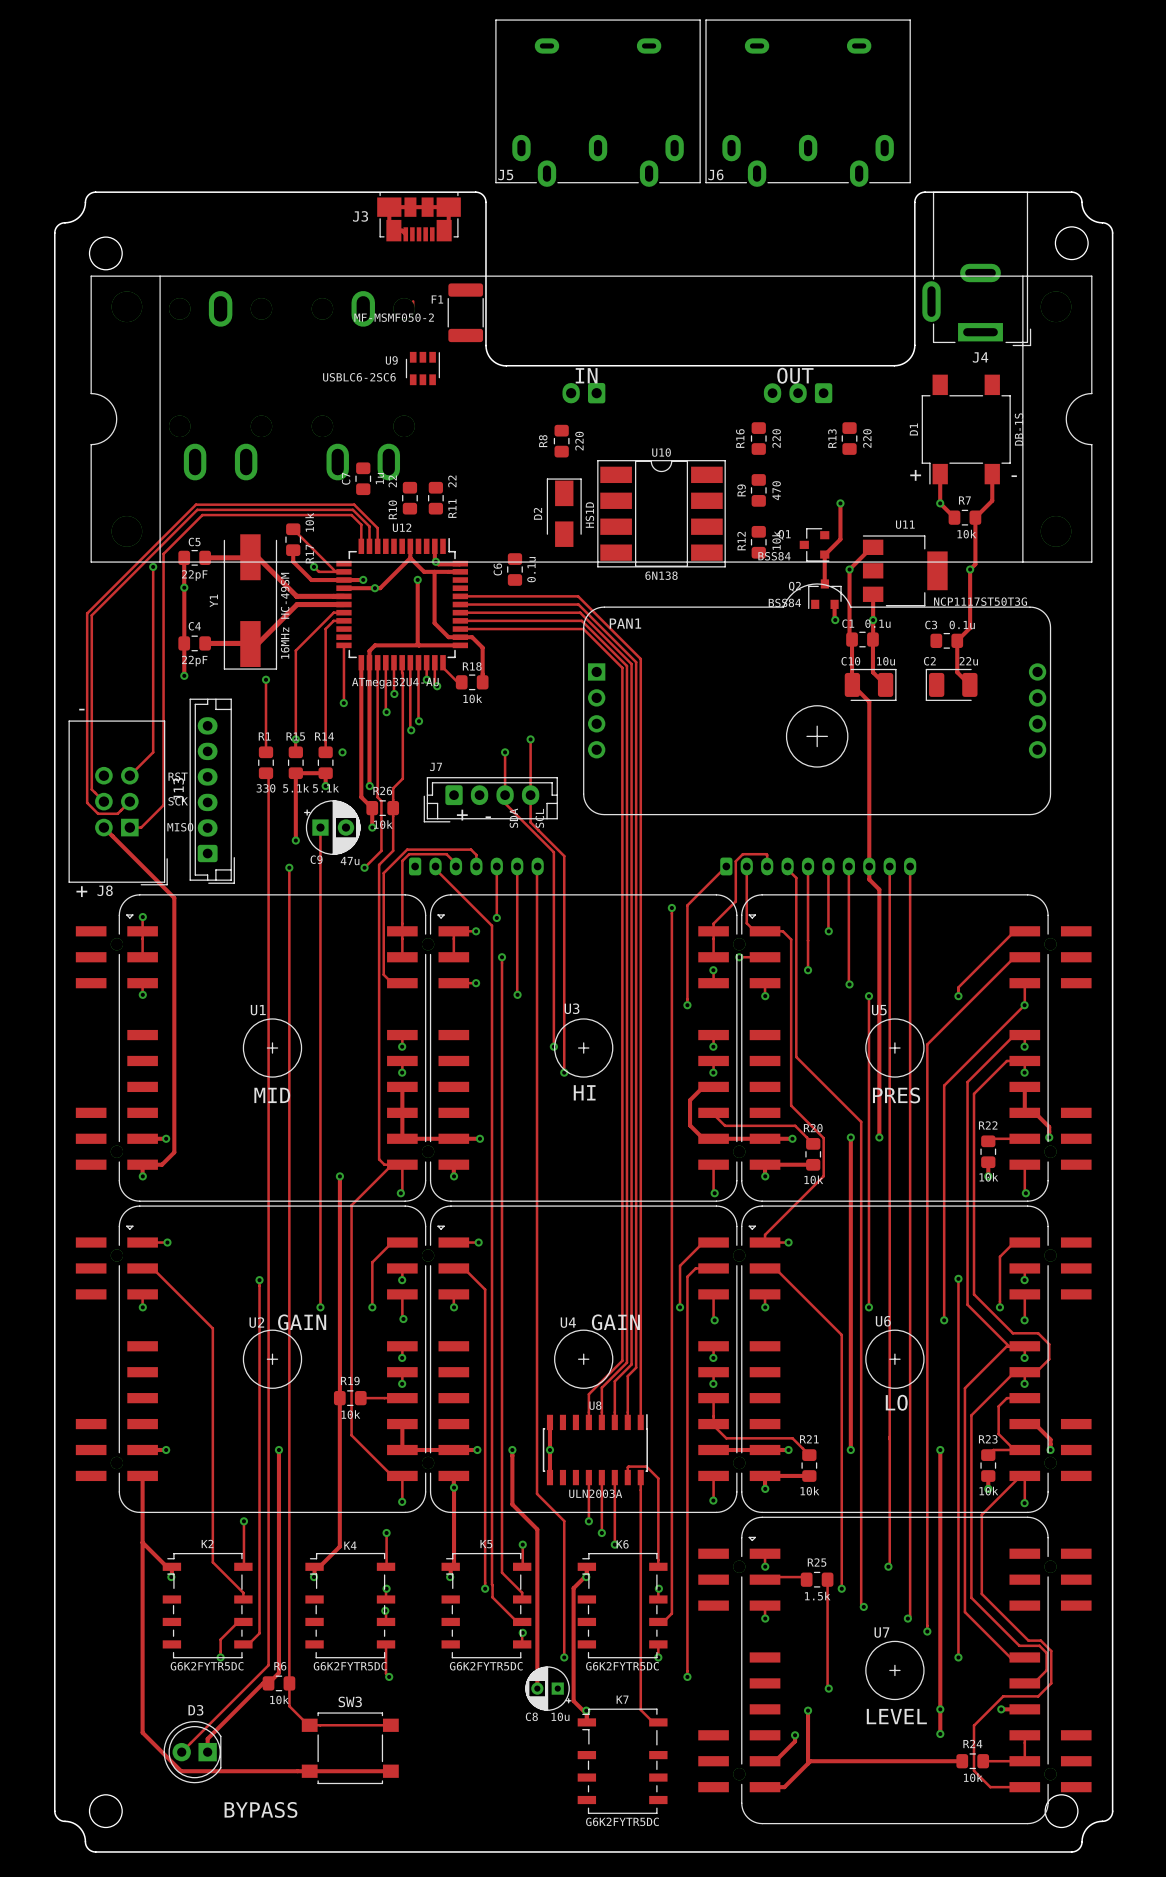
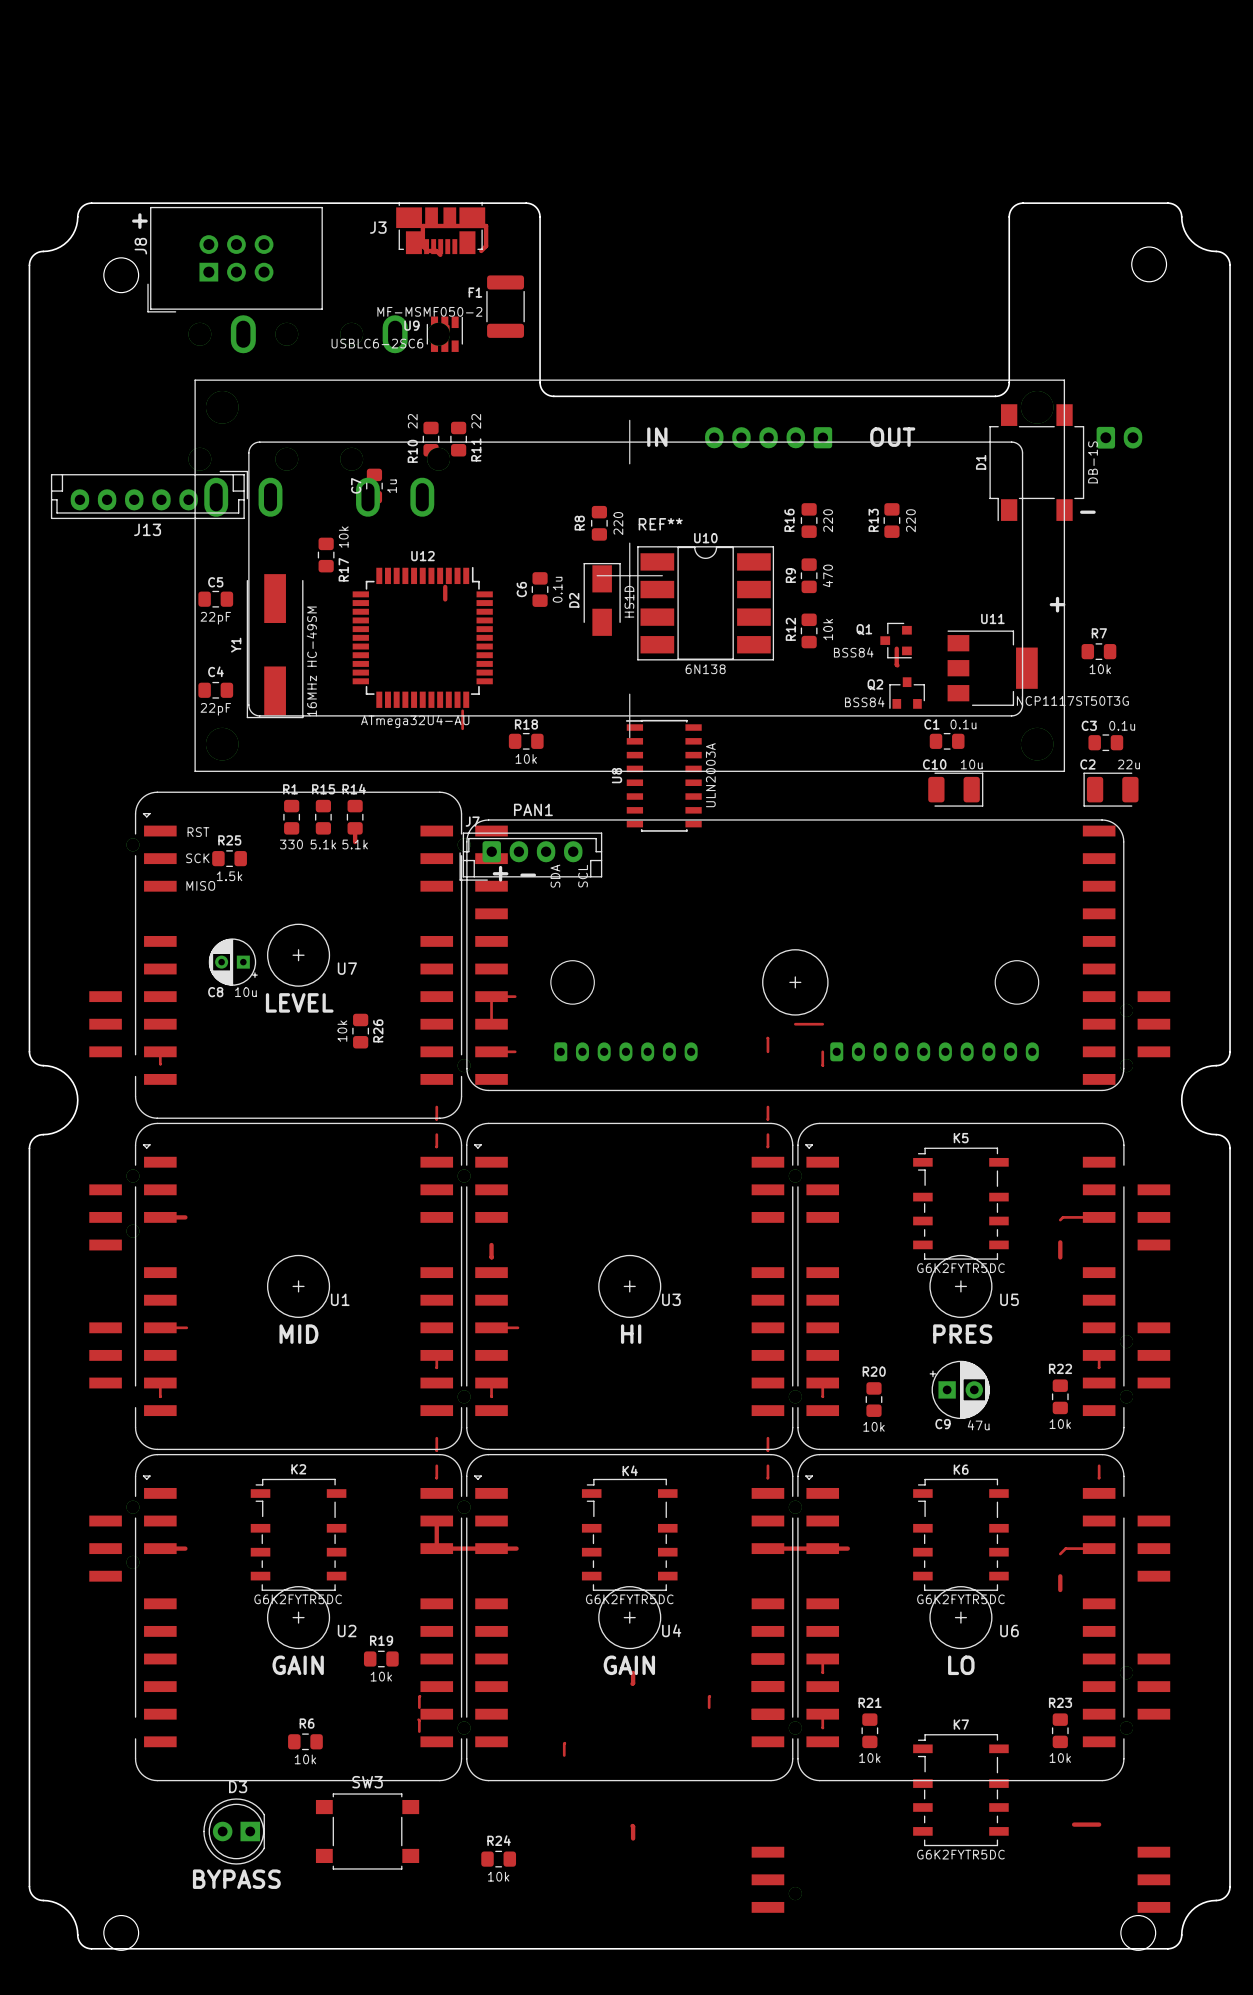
J5: (598, 103) -> none
J6: (808, 103) -> none
board edge: none -> (1023, 203) (1171, 203) (1179, 210) (1184, 230) (1191, 241) (1203, 248) (1223, 253) (1229, 263) (1230, 1051) (1228, 1058) (1223, 1063) (1203, 1068) (1191, 1075) (1184, 1086) (1181, 1100) (1184, 1113) (1191, 1124) (1203, 1131) (1223, 1136) (1228, 1141) (1230, 1148) (1230, 1886) (1225, 1896) (1216, 1900)
board edge: none -> (1023, 203) (1014, 205) (1009, 215) (1009, 384) (1003, 393) (995, 396)
text: none -> + (139, 221)
J3 position: (419, 216) -> (440, 227)
J4: (976, 268) -> none
F1 position: (465, 312) -> (505, 306)
board edge: (506, 365) (899, 365) (908, 359) (914, 347) (914, 202) (919, 193) (1073, 192) (1080, 197) (1083, 210) (1087, 216) (1094, 221) (1107, 224) (1111, 229) (1112, 1811) -> none
board edge: (506, 365) (493, 361) (488, 355) (486, 348) (485, 202) (483, 196) (478, 192) (94, 192) (86, 197) (83, 210) (79, 216) (72, 221) (59, 224) (55, 230) (55, 1815) (59, 1819) (72, 1822) (79, 1827) (83, 1833) (86, 1846) (95, 1851) (1071, 1851) -> none
board edge: none -> (995, 396) (548, 395) (541, 389) (540, 382) (539, 215) (536, 207) (528, 203) (89, 203) (79, 210) (75, 230) (67, 241) (56, 248) (37, 252) (31, 258) (29, 265) (29, 1051) (31, 1058) (36, 1063) (56, 1068) (67, 1075) (75, 1086) (77, 1100) (75, 1113) (67, 1124) (56, 1131) (36, 1136) (31, 1141) (29, 1148) (29, 1886)
U9 position: (422, 368) -> (444, 334)
text position: IN (586, 375) -> IN (657, 437)
text position: OUT (795, 375) -> OUT (892, 437)
part: (583, 393) -> none
part: (798, 393) -> none
part: none -> (768, 437)
part: none -> (1119, 437)
part: (591, 419) -> none
R16 position: (758, 438) -> (809, 520)
R13 position: (849, 438) -> (891, 520)
R8 position: (561, 441) -> (599, 523)
track: (940, 474) (940, 503) (954, 517) -> none
track: (992, 474) (992, 500) (975, 517) (975, 564) (970, 569) (970, 627) (957, 640) (957, 672) (969, 684) -> none
text position: + (915, 475) -> + (1057, 604)
C7 position: (363, 478) -> (374, 486)
R9 position: (758, 490) -> (809, 575)
R10 position: (409, 498) -> (431, 439)
R11 position: (435, 498) -> (458, 439)
track: (840, 503) (840, 539) (824, 554) (824, 583) -> none
via: (840, 503) -> none
via: (940, 503) -> none
D2 position: (564, 512) -> (602, 599)
U10 position: (661, 513) -> (705, 603)
R7 position: (964, 517) -> (1098, 651)
track: (293, 529) (335, 571) -> none
REF**: none -> (629, 575)
R17 position: (293, 539) -> (326, 555)
R12 position: (758, 542) -> (809, 630)
Q1 position: (814, 544) -> (896, 640)
track: (361, 546) (361, 524) (351, 515) (202, 515) (163, 553) (163, 805) (141, 827) (129, 827) -> none
track: (369, 546) (369, 526) (352, 509) (197, 509) (91, 615) (91, 789) (103, 801) -> none
track: (377, 546) (377, 528) (354, 504) (195, 504) (87, 613) (87, 802) (98, 813) (117, 813) (129, 801) -> none
track: (434, 546) (434, 560) (438, 564) (460, 563) -> none
track: (873, 547) (849, 569) (849, 637) (852, 639) (852, 684) (869, 701) (869, 879) (879, 889) (879, 1137) -> none
track: (293, 550) (293, 561) (311, 580) (363, 580) -> none
track: (184, 557) (184, 587) -> none
track: (205, 557) (257, 557) (296, 596) (343, 596) -> none
via: (435, 561) -> none
track: (153, 566) (153, 752) (129, 775) -> none
via: (153, 566) -> none
track: (313, 566) (318, 571) (343, 571) -> none
via: (313, 566) -> none
C6 position: (514, 569) -> (540, 589)
via: (849, 569) -> none
via: (970, 569) -> none
U11 position: (905, 570) -> (992, 668)
track: (434, 571) (434, 623) (448, 637) (472, 637) (482, 647) (482, 682) -> none
track: (460, 571) (424, 571) (410, 558) (380, 588) (343, 588) -> none
via: (363, 579) -> none
track: (417, 579) (419, 645) -> none
via: (417, 579) -> none
PAN1 footprint: [583, 583, 1052, 816] -> [457, 819, 1134, 1092]
track: (184, 587) (184, 643) -> none
via: (184, 587) -> none
via: (374, 588) -> none
Q2 position: (824, 594) -> (907, 693)
track: (873, 594) (872, 672) (885, 684) -> none
track: (460, 596) (578, 596) (640, 658) (640, 1422) -> none
track: (343, 604) (297, 604) (257, 644) (205, 643) -> none
U12 position: (402, 604) -> (422, 637)
track: (460, 604) (578, 604) (636, 662) (636, 1367) (627, 1376) (627, 1422) -> none
track: (343, 612) (333, 612) (295, 650) (295, 752) -> none
track: (460, 612) (580, 612) (631, 664) (631, 1364) (614, 1381) (614, 1422) -> none
track: (343, 620) (333, 620) (325, 628) (325, 752) -> none
track: (460, 620) (581, 620) (626, 665) (626, 1362) (601, 1387) (601, 1422) -> none
via: (835, 620) -> none
via: (873, 620) -> none
PAN1 name position: PAN1 (625, 623) -> PAN1 (533, 809)
track: (460, 629) (583, 629) (622, 667) (622, 1360) (588, 1394) (588, 1422) -> none
C1 position: (862, 639) -> (947, 741)
C3 position: (946, 640) -> (1105, 742)
track: (184, 643) (184, 675) -> none
track: (343, 645) (343, 703) -> none
track: (460, 645) (375, 645) (369, 650) (369, 786) -> none
track: (361, 662) (361, 797) (372, 808) (372, 827) -> none
track: (377, 662) (377, 797) (381, 801) (381, 850) (364, 867) -> none
track: (385, 662) (386, 712) -> none
track: (393, 662) (394, 694) -> none
track: (402, 662) (402, 778) (393, 788) (393, 850) (379, 864) (379, 1159) (384, 1164) (402, 1164) (400, 1193) -> none
track: (410, 662) (411, 730) -> none
track: (418, 662) (419, 721) -> none
track: (434, 662) (434, 683) (437, 686) -> none
track: (443, 662) (443, 667) (457, 682) (461, 682) -> none
via: (184, 675) -> none
track: (266, 679) (266, 752) -> none
via: (266, 679) -> none
via: (426, 679) -> none
R18 position: (472, 682) -> (526, 741)
C10 position: (870, 684) -> (955, 789)
C2 position: (951, 684) -> (1110, 789)
via: (437, 686) -> none
via: (394, 694) -> none
via: (343, 703) -> none
text: - (81, 709) -> none
via: (386, 712) -> none
via: (419, 721) -> none
via: (411, 730) -> none
via: (295, 739) -> none
track: (530, 739) (530, 822) (564, 856) (564, 1072) -> none
via: (530, 739) -> none
via: (342, 752) -> none
track: (505, 752) (505, 803) (553, 852) (553, 1046) -> none
via: (505, 752) -> none
track: (266, 773) (268, 775) (268, 1665) (181, 1752) -> none
track: (325, 773) (295, 773) (295, 840) -> none
via: (325, 786) -> none
via: (369, 786) -> none
J13 rotation: 0° (212, 791) -> 90° counterclockwise (149, 494)
J13 position: (212, 791) -> (149, 494)
J8 rotation: 0° (118, 802) -> 90° clockwise (235, 259)
J8 position: (118, 802) -> (235, 259)
R26 rotation: 0° (382, 808) -> 90° clockwise (360, 1031)
R26 position: (382, 808) -> (360, 1031)
track: (103, 827) (174, 897) (174, 1152) (162, 1164) (142, 1164) (142, 1176) -> none
track: (320, 827) (320, 1307) -> none
C9 position: (332, 827) -> (959, 1389)
via: (372, 827) -> none
via: (295, 840) -> none
track: (435, 866) (435, 869) (492, 925) (492, 1597) (517, 1621) (522, 1621) -> none
track: (455, 866) (455, 863) (446, 854) (409, 854) (402, 860) (402, 957) -> none
track: (476, 866) (476, 854) (471, 849) (407, 849) (383, 873) (383, 974) (392, 983) (402, 983) -> none
part position: (476, 866) -> (625, 1051)
track: (496, 866) (496, 917) -> none
track: (517, 866) (517, 994) -> none
track: (537, 866) (537, 1493) (564, 1521) (564, 1657) -> none
track: (726, 866) (687, 905) (687, 1005) -> none
track: (746, 866) (746, 923) (754, 931) (782, 931) (791, 939) (791, 1105) (823, 1138) (823, 1176) (765, 1234) (765, 1242) (788, 1242) -> none
track: (767, 866) (766, 854) (742, 854) (735, 861) (735, 901) (713, 923) (713, 957) -> none
track: (787, 866) (787, 869) (796, 877) (796, 1057) (861, 1121) (861, 1604) (863, 1606) -> none
part position: (818, 866) -> (934, 1051)
track: (828, 866) (828, 931) -> none
track: (848, 866) (849, 984) -> none
track: (889, 866) (888, 1566) -> none
track: (910, 866) (910, 1616) (907, 1618) -> none
track: (289, 867) (289, 1683) -> none
via: (289, 867) -> none
via: (364, 867) -> none
text: + (81, 891) -> none
track: (671, 907) (671, 1613) (663, 1621) (658, 1621) -> none
via: (671, 907) -> none
track: (142, 917) (142, 957) -> none
via: (142, 917) -> none
via: (496, 917) -> none
via: (476, 931) -> none
via: (828, 931) -> none
track: (1024, 931) (1014, 931) (958, 987) (958, 996) -> none
text: none -> LEVEL (299, 1002)
track: (502, 957) (502, 1572) (522, 1592) (522, 1599) -> none
via: (502, 957) -> none
via: (739, 957) -> none
track: (1024, 957) (1014, 957) (927, 1044) (927, 1631) -> none
via: (713, 970) -> none
via: (808, 970) -> none
via: (476, 983) -> none
track: (1024, 983) (1024, 1005) (944, 1085) (944, 1320) -> none
via: (849, 984) -> none
via: (142, 994) -> none
via: (517, 994) -> none
via: (765, 996) -> none
track: (868, 996) (868, 1307) -> none
via: (868, 996) -> none
via: (958, 996) -> none
via: (687, 1005) -> none
via: (1024, 1005) -> none
U3 name position: U3 (572, 1008) -> U3 (671, 1299)
U1 name position: U1 (258, 1010) -> U1 (340, 1299)
U5 name position: U5 (879, 1010) -> U5 (1009, 1299)
via: (402, 1046) -> none
via: (553, 1046) -> none
via: (713, 1046) -> none
track: (1024, 1046) (1024, 1035) (1014, 1035) (967, 1082) (967, 1304) (1009, 1346) -> none
via: (1024, 1046) -> none
U1 position: (272, 1048) -> (298, 1286)
U3 position: (583, 1048) -> (629, 1286)
U5 position: (894, 1048) -> (960, 1286)
via: (402, 1072) -> none
via: (564, 1072) -> none
via: (713, 1072) -> none
track: (1024, 1072) (1024, 1060) (1006, 1060) (974, 1093) (974, 1294) (1012, 1333) (1038, 1333) (1049, 1344) (1049, 1359) (1036, 1372) (1014, 1372) (971, 1415) (971, 1597) (1019, 1645) (1039, 1645) (1046, 1652) (1046, 1670) (1033, 1683) (1024, 1683) -> none
via: (1024, 1072) -> none
track: (402, 1086) (402, 1138) (479, 1138) -> none
track: (713, 1086) (703, 1086) (690, 1100) (690, 1125) (703, 1138) (792, 1138) -> none
track: (1024, 1086) (1024, 1112) (1035, 1112) (1049, 1127) (1049, 1137) -> none
text position: HI (584, 1092) -> HI (631, 1334)
text position: MID (272, 1095) -> MID (298, 1334)
text position: PRES (896, 1095) -> PRES (962, 1334)
track: (713, 1112) (725, 1125) (795, 1125) (813, 1143) -> none
track: (850, 1137) (850, 1450) -> none
via: (850, 1137) -> none
via: (879, 1137) -> none
via: (1049, 1137) -> none
via: (166, 1138) -> none
via: (479, 1138) -> none
via: (792, 1138) -> none
R22 position: (988, 1151) -> (1060, 1396)
R20 position: (813, 1154) -> (873, 1399)
track: (392, 1164) (351, 1205) (351, 1435) (392, 1475) (402, 1475) (402, 1501) -> none
track: (713, 1164) (714, 1193) -> none
track: (813, 1164) (765, 1164) (765, 1176) -> none
track: (1024, 1164) (1025, 1193) -> none
via: (142, 1176) -> none
track: (339, 1176) (339, 1398) -> none
via: (339, 1176) -> none
via: (454, 1176) -> none
via: (765, 1176) -> none
via: (988, 1176) -> none
via: (400, 1193) -> none
via: (714, 1193) -> none
via: (1025, 1193) -> none
via: (167, 1242) -> none
track: (402, 1242) (392, 1242) (372, 1262) (372, 1307) -> none
via: (478, 1242) -> none
track: (713, 1242) (703, 1242) (680, 1265) (680, 1307) -> none
via: (788, 1242) -> none
track: (1035, 1242) (1014, 1242) (999, 1256) (999, 1307) -> none
track: (142, 1268) (152, 1268) (212, 1328) (212, 1562) (243, 1592) (243, 1599) -> none
track: (453, 1268) (464, 1268) (485, 1289) (485, 1588) -> none
track: (713, 1268) (695, 1268) (687, 1276) (687, 1676) -> none
track: (765, 1268) (775, 1268) (841, 1334) (841, 1588) -> none
track: (958, 1278) (958, 1657) -> none
via: (958, 1278) -> none
track: (259, 1280) (259, 1633) (248, 1644) (243, 1644) -> none
via: (259, 1280) -> none
via: (402, 1280) -> none
via: (1024, 1280) -> none
track: (402, 1294) (403, 1319) -> none
track: (713, 1294) (714, 1320) -> none
track: (1024, 1294) (1024, 1320) -> none
via: (142, 1307) -> none
via: (320, 1307) -> none
via: (372, 1307) -> none
via: (454, 1307) -> none
via: (680, 1307) -> none
via: (765, 1307) -> none
via: (868, 1307) -> none
via: (999, 1307) -> none
via: (403, 1319) -> none
via: (714, 1320) -> none
via: (944, 1320) -> none
via: (1024, 1320) -> none
U6 name position: U6 (883, 1321) -> U6 (1009, 1631)
U2 name position: U2 (256, 1322) -> U2 (347, 1631)
text: GAIN (302, 1322) -> none
U4 name position: U4 (568, 1322) -> U4 (671, 1630)
text: GAIN (615, 1322) -> none
via: (402, 1357) -> none
via: (713, 1357) -> none
track: (1024, 1357) (1024, 1346) (1006, 1346) (964, 1388) (964, 1612) (1010, 1657) (1024, 1657) -> none
via: (1024, 1357) -> none
U2 position: (272, 1359) -> (298, 1617)
U4 position: (583, 1359) -> (629, 1617)
U6 position: (894, 1359) -> (960, 1617)
via: (402, 1383) -> none
via: (713, 1383) -> none
via: (1024, 1383) -> none
track: (339, 1398) (339, 1546) (319, 1566) (314, 1566) (313, 1577) -> none
R19 position: (350, 1398) -> (381, 1659)
track: (360, 1398) (402, 1398) -> none
track: (713, 1398) (713, 1425) (726, 1438) (792, 1438) (809, 1455) -> none
track: (1035, 1398) (1006, 1398) (998, 1406) (998, 1434) (1014, 1450) -> none
text position: LO (896, 1402) -> LO (961, 1665)
track: (549, 1422) (549, 1477) -> none
track: (1024, 1424) (1034, 1424) (1050, 1439) (1050, 1450) -> none
U8 rotation: 0° (595, 1449) -> 90° counterclockwise (663, 775)
U8 position: (595, 1449) -> (663, 775)
via: (166, 1450) -> none
track: (278, 1450) (278, 1672) (268, 1683) (263, 1683) (207, 1738) (207, 1752) -> none
via: (278, 1450) -> none
via: (477, 1450) -> none
track: (512, 1450) (512, 1504) (537, 1529) (537, 1688) -> none
via: (512, 1450) -> none
via: (549, 1450) -> none
via: (788, 1450) -> none
via: (850, 1450) -> none
track: (940, 1450) (940, 1733) -> none
via: (940, 1450) -> none
via: (1050, 1450) -> none
R21 position: (809, 1465) -> (869, 1730)
R23 position: (988, 1465) -> (1060, 1730)
track: (142, 1475) (142, 1732) (181, 1771) (390, 1771) -> none
track: (453, 1475) (454, 1563) (450, 1566) (450, 1577) -> none
track: (713, 1475) (713, 1500) -> none
track: (809, 1475) (765, 1475) (765, 1488) -> none
track: (588, 1477) (588, 1521) -> none
track: (601, 1477) (601, 1532) -> none
track: (614, 1477) (614, 1544) -> none
track: (627, 1477) (628, 1466) (646, 1466) (658, 1478) (658, 1566) -> none
track: (640, 1477) (640, 1709) (653, 1722) (658, 1722) -> none
via: (454, 1487) -> none
via: (765, 1488) -> none
via: (988, 1488) -> none
via: (713, 1500) -> none
via: (402, 1501) -> none
track: (1024, 1503) (1024, 1475) (1020, 1475) (981, 1514) (981, 1593) (1028, 1640) (1040, 1640) (1051, 1651) (1051, 1683) (1038, 1696) (1003, 1696) (974, 1725) (974, 1770) (990, 1787) (1024, 1787) -> none
via: (1024, 1503) -> none
track: (243, 1521) (243, 1566) -> none
via: (243, 1521) -> none
via: (588, 1521) -> none
track: (386, 1532) (386, 1566) -> none
via: (386, 1532) -> none
via: (601, 1532) -> none
track: (142, 1542) (166, 1566) (171, 1566) (171, 1577) -> none
track: (522, 1544) (522, 1566) -> none
via: (522, 1544) -> none
via: (614, 1544) -> none
text: none -> GAIN (298, 1665)
text: none -> GAIN (629, 1665)
via: (765, 1566) -> none
via: (888, 1566) -> none
track: (586, 1574) (573, 1588) (573, 1700) (586, 1714) -> none
via: (171, 1577) -> none
via: (313, 1577) -> none
via: (450, 1577) -> none
via: (586, 1577) -> none
track: (765, 1579) (767, 1577) (806, 1577) (806, 1579) -> none
R25 position: (817, 1579) -> (229, 858)
track: (827, 1579) (828, 1688) -> none
via: (386, 1588) -> none
via: (485, 1588) -> none
via: (658, 1588) -> none
via: (841, 1588) -> none
K2 position: (207, 1605) -> (298, 1534)
K4 position: (350, 1605) -> (629, 1534)
K5 position: (486, 1605) -> (960, 1203)
K6 position: (622, 1605) -> (960, 1534)
via: (863, 1606) -> none
via: (385, 1610) -> none
via: (765, 1618) -> none
via: (907, 1618) -> none
track: (243, 1621) (238, 1621) (220, 1639) (220, 1657) -> none
via: (927, 1631) -> none
via: (522, 1632) -> none
U7 name position: U7 (881, 1632) -> U7 (347, 968)
track: (386, 1644) (386, 1673) (389, 1676) -> none
track: (658, 1644) (658, 1657) -> none
via: (220, 1657) -> none
via: (564, 1657) -> none
via: (658, 1657) -> none
via: (958, 1657) -> none
U7 position: (894, 1670) -> (298, 955)
via: (389, 1676) -> none
via: (687, 1676) -> none
R6 position: (278, 1683) -> (305, 1741)
track: (289, 1683) (289, 1706) (308, 1725) (390, 1725) -> none
C8 position: (548, 1688) -> (233, 962)
via: (828, 1688) -> none
via: (940, 1709) -> none
via: (1001, 1709) -> none
via: (586, 1710) -> none
track: (808, 1710) (808, 1763) -> none
via: (808, 1710) -> none
text: LEVEL (896, 1716) -> none
via: (940, 1733) -> none
track: (795, 1735) (795, 1741) (775, 1761) (765, 1761) -> none
via: (795, 1735) -> none
track: (1024, 1735) (1024, 1761) (983, 1761) -> none
SW3 position: (350, 1748) -> (367, 1831)
D3 position: (192, 1752) -> (234, 1831)
K7 position: (622, 1761) -> (960, 1790)
track: (962, 1761) (810, 1761) (784, 1787) (765, 1787) -> none
R24 position: (972, 1761) -> (498, 1859)
board edge: none -> (29, 1886) (31, 1893) (36, 1898) (56, 1903) (67, 1910) (75, 1921) (79, 1941) (84, 1946) (91, 1948) (1167, 1948) (1174, 1946) (1179, 1941) (1184, 1921) (1191, 1910) (1203, 1903) (1216, 1900)
text position: BYPASS (260, 1809) -> BYPASS (236, 1879)
board edge: (1112, 1811) (1107, 1819) (1094, 1822) (1088, 1827) (1083, 1833) (1080, 1846) (1071, 1851) -> none

